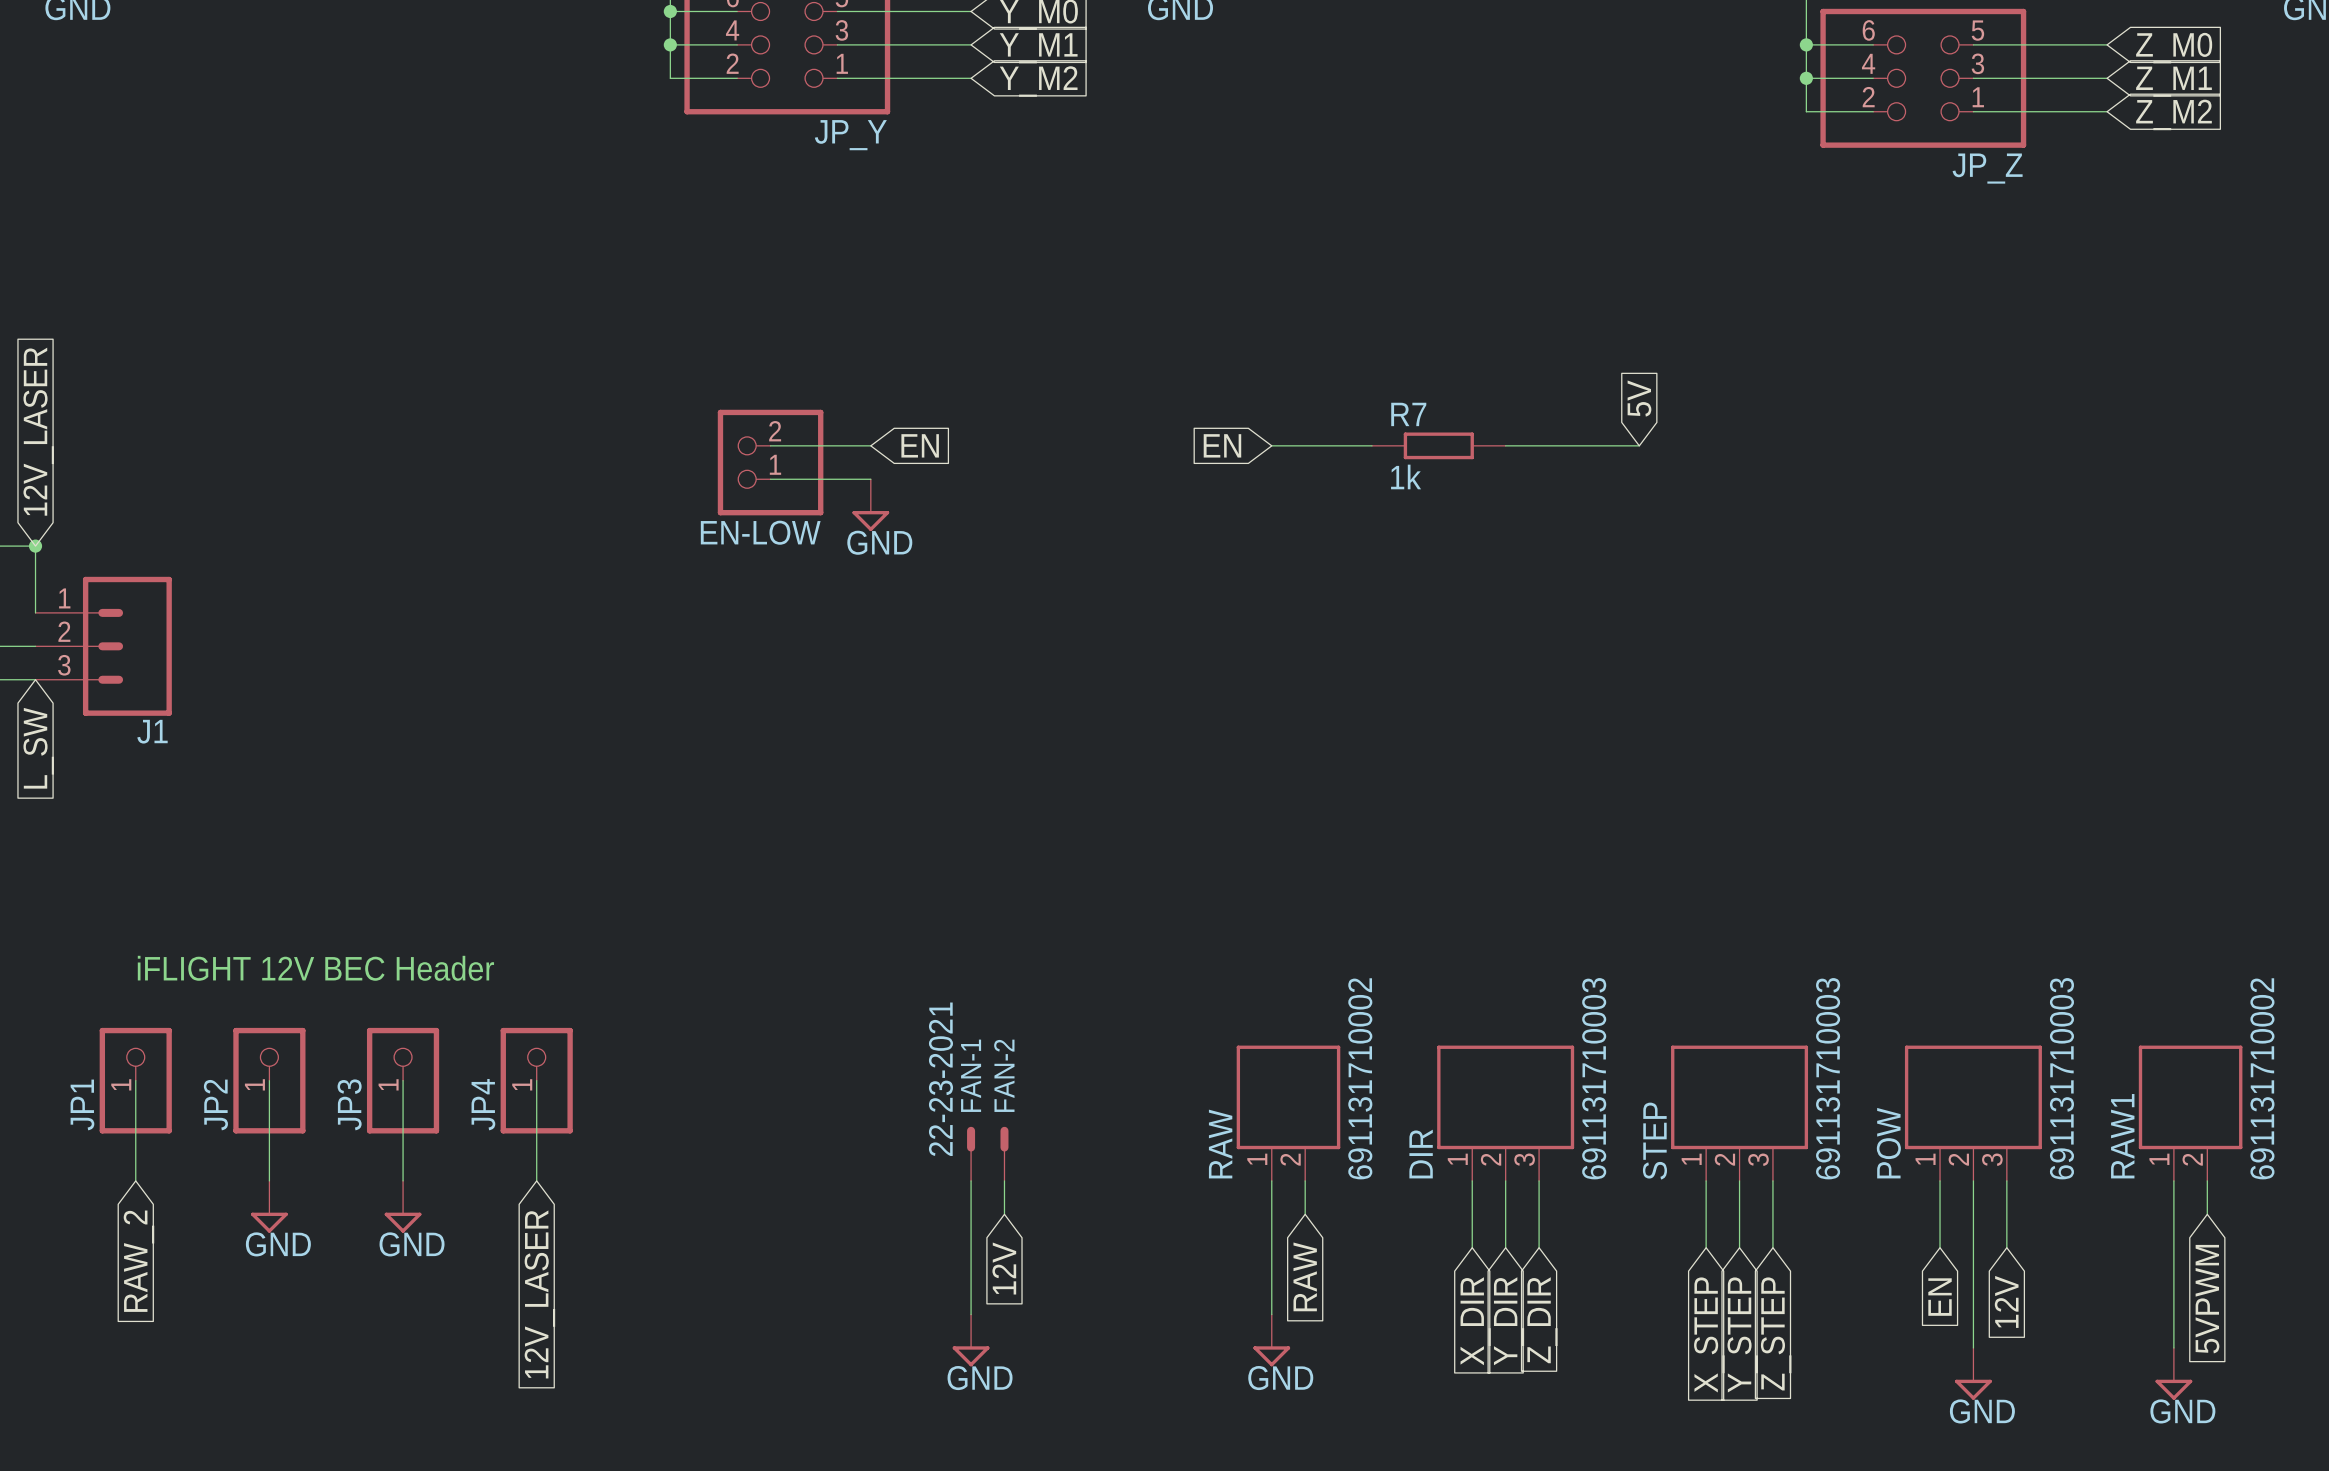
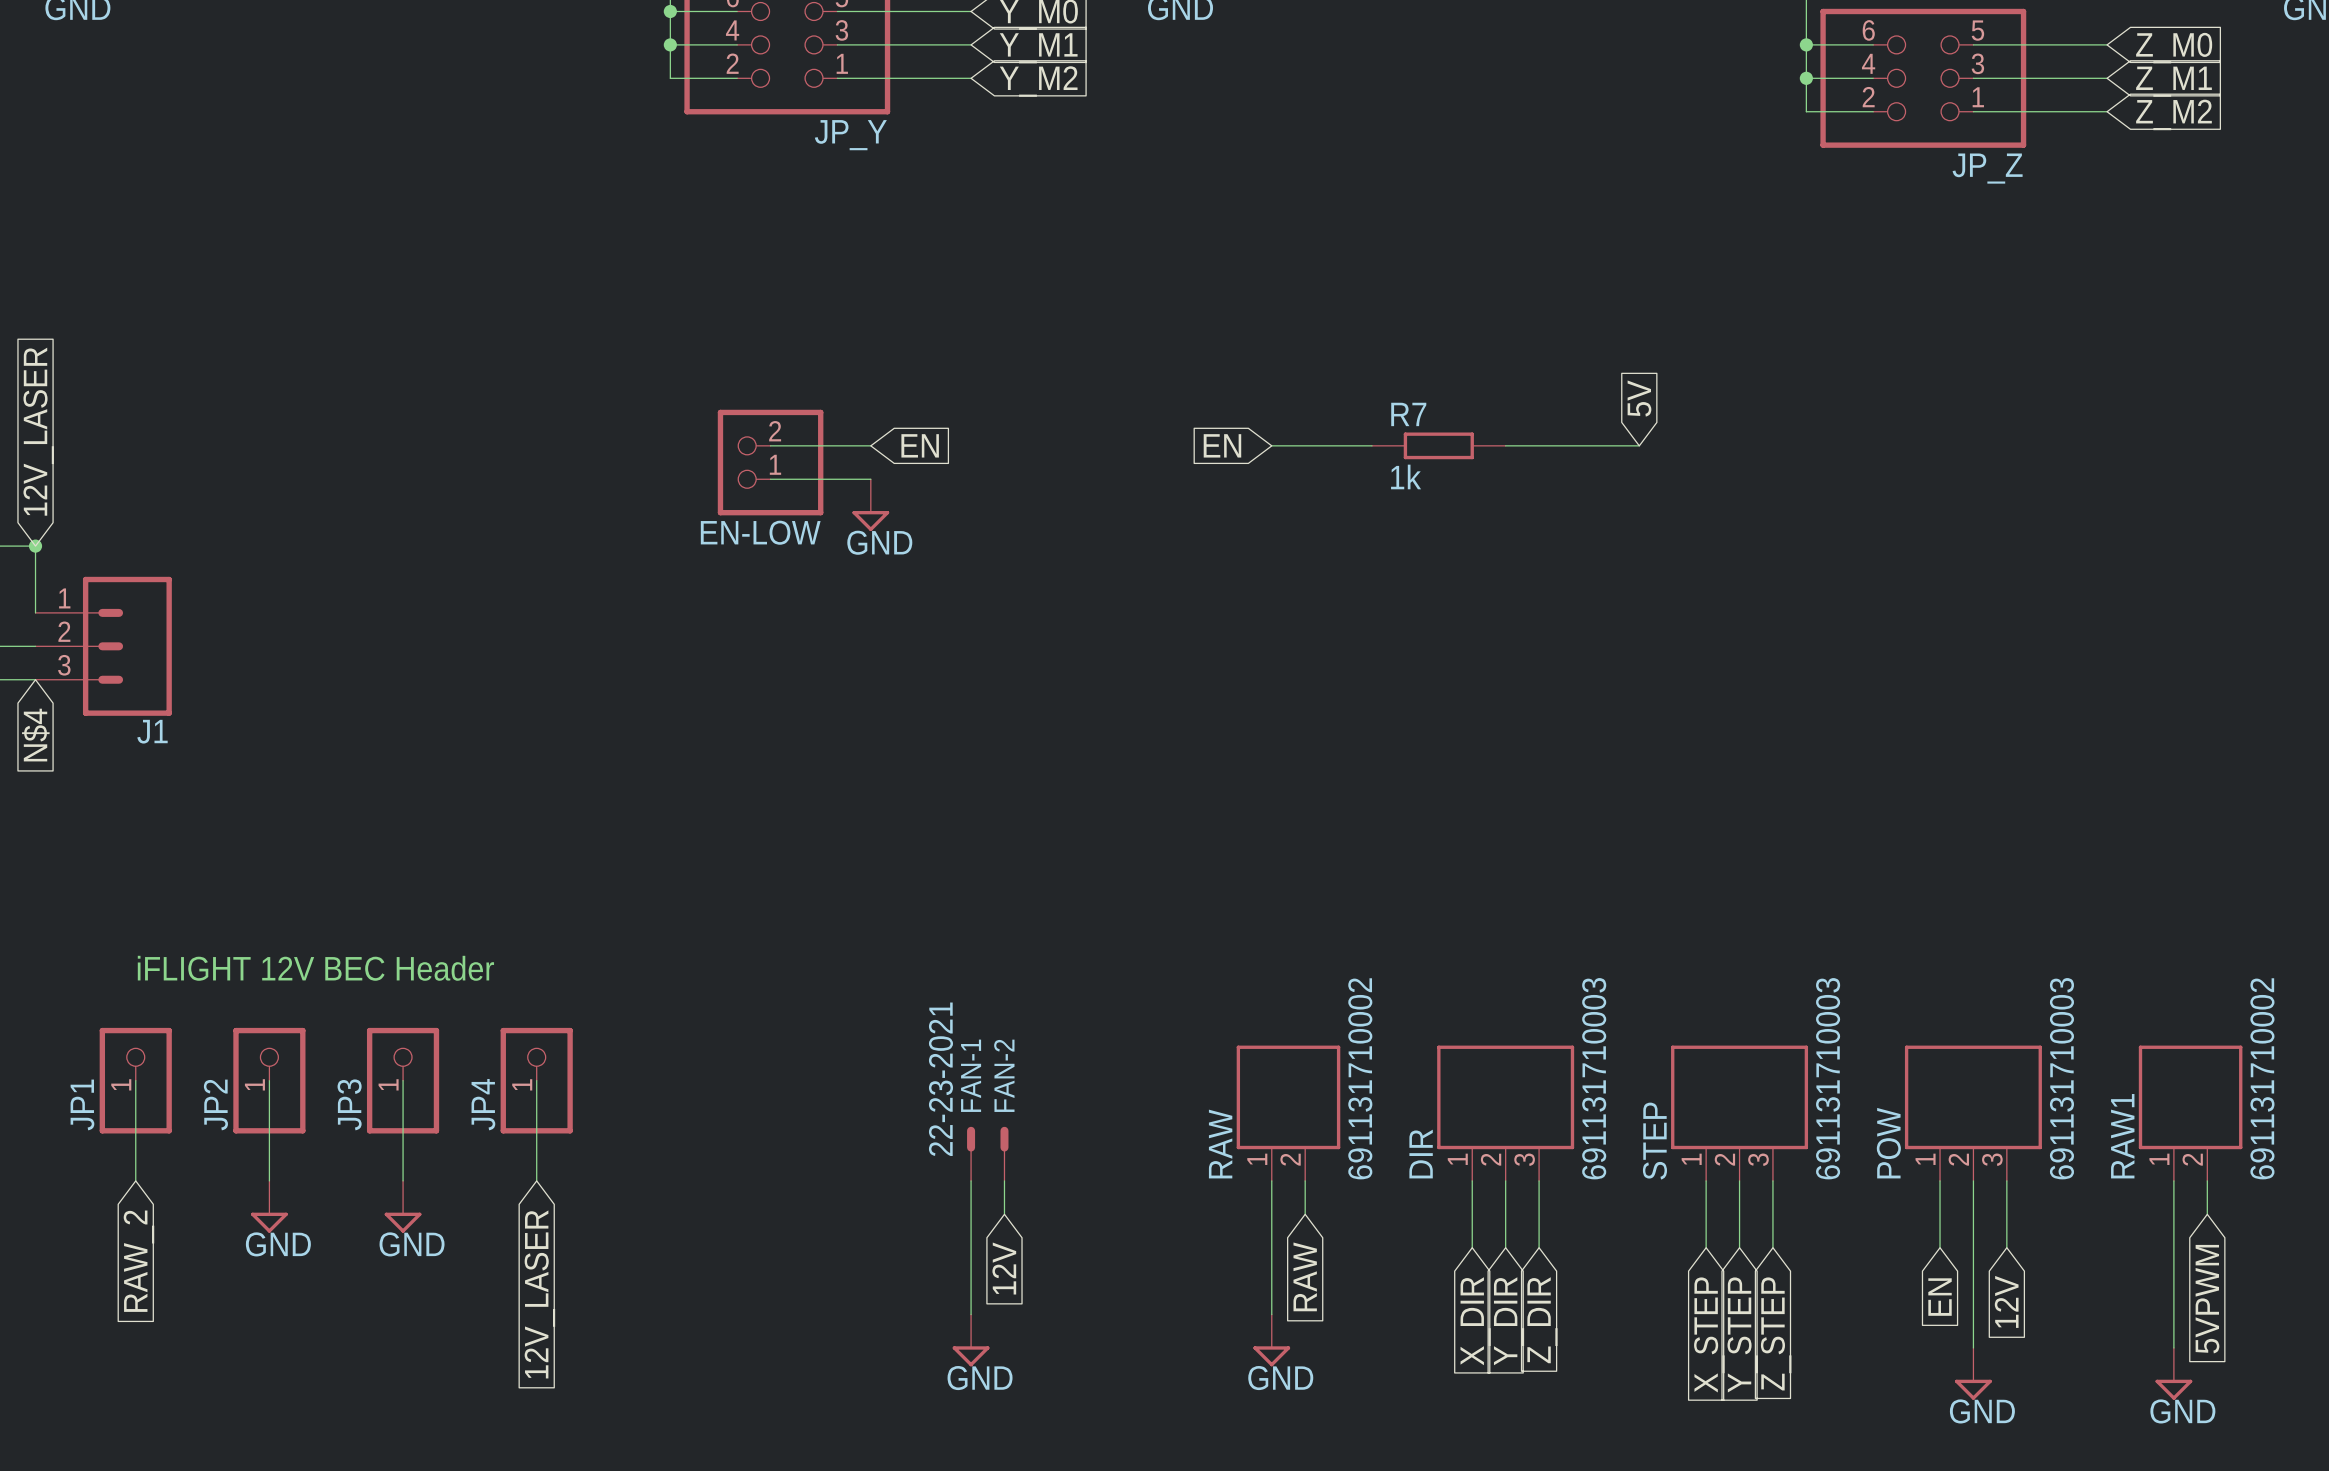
global label: L_SW (38, 748) -> N$4 (35, 735)

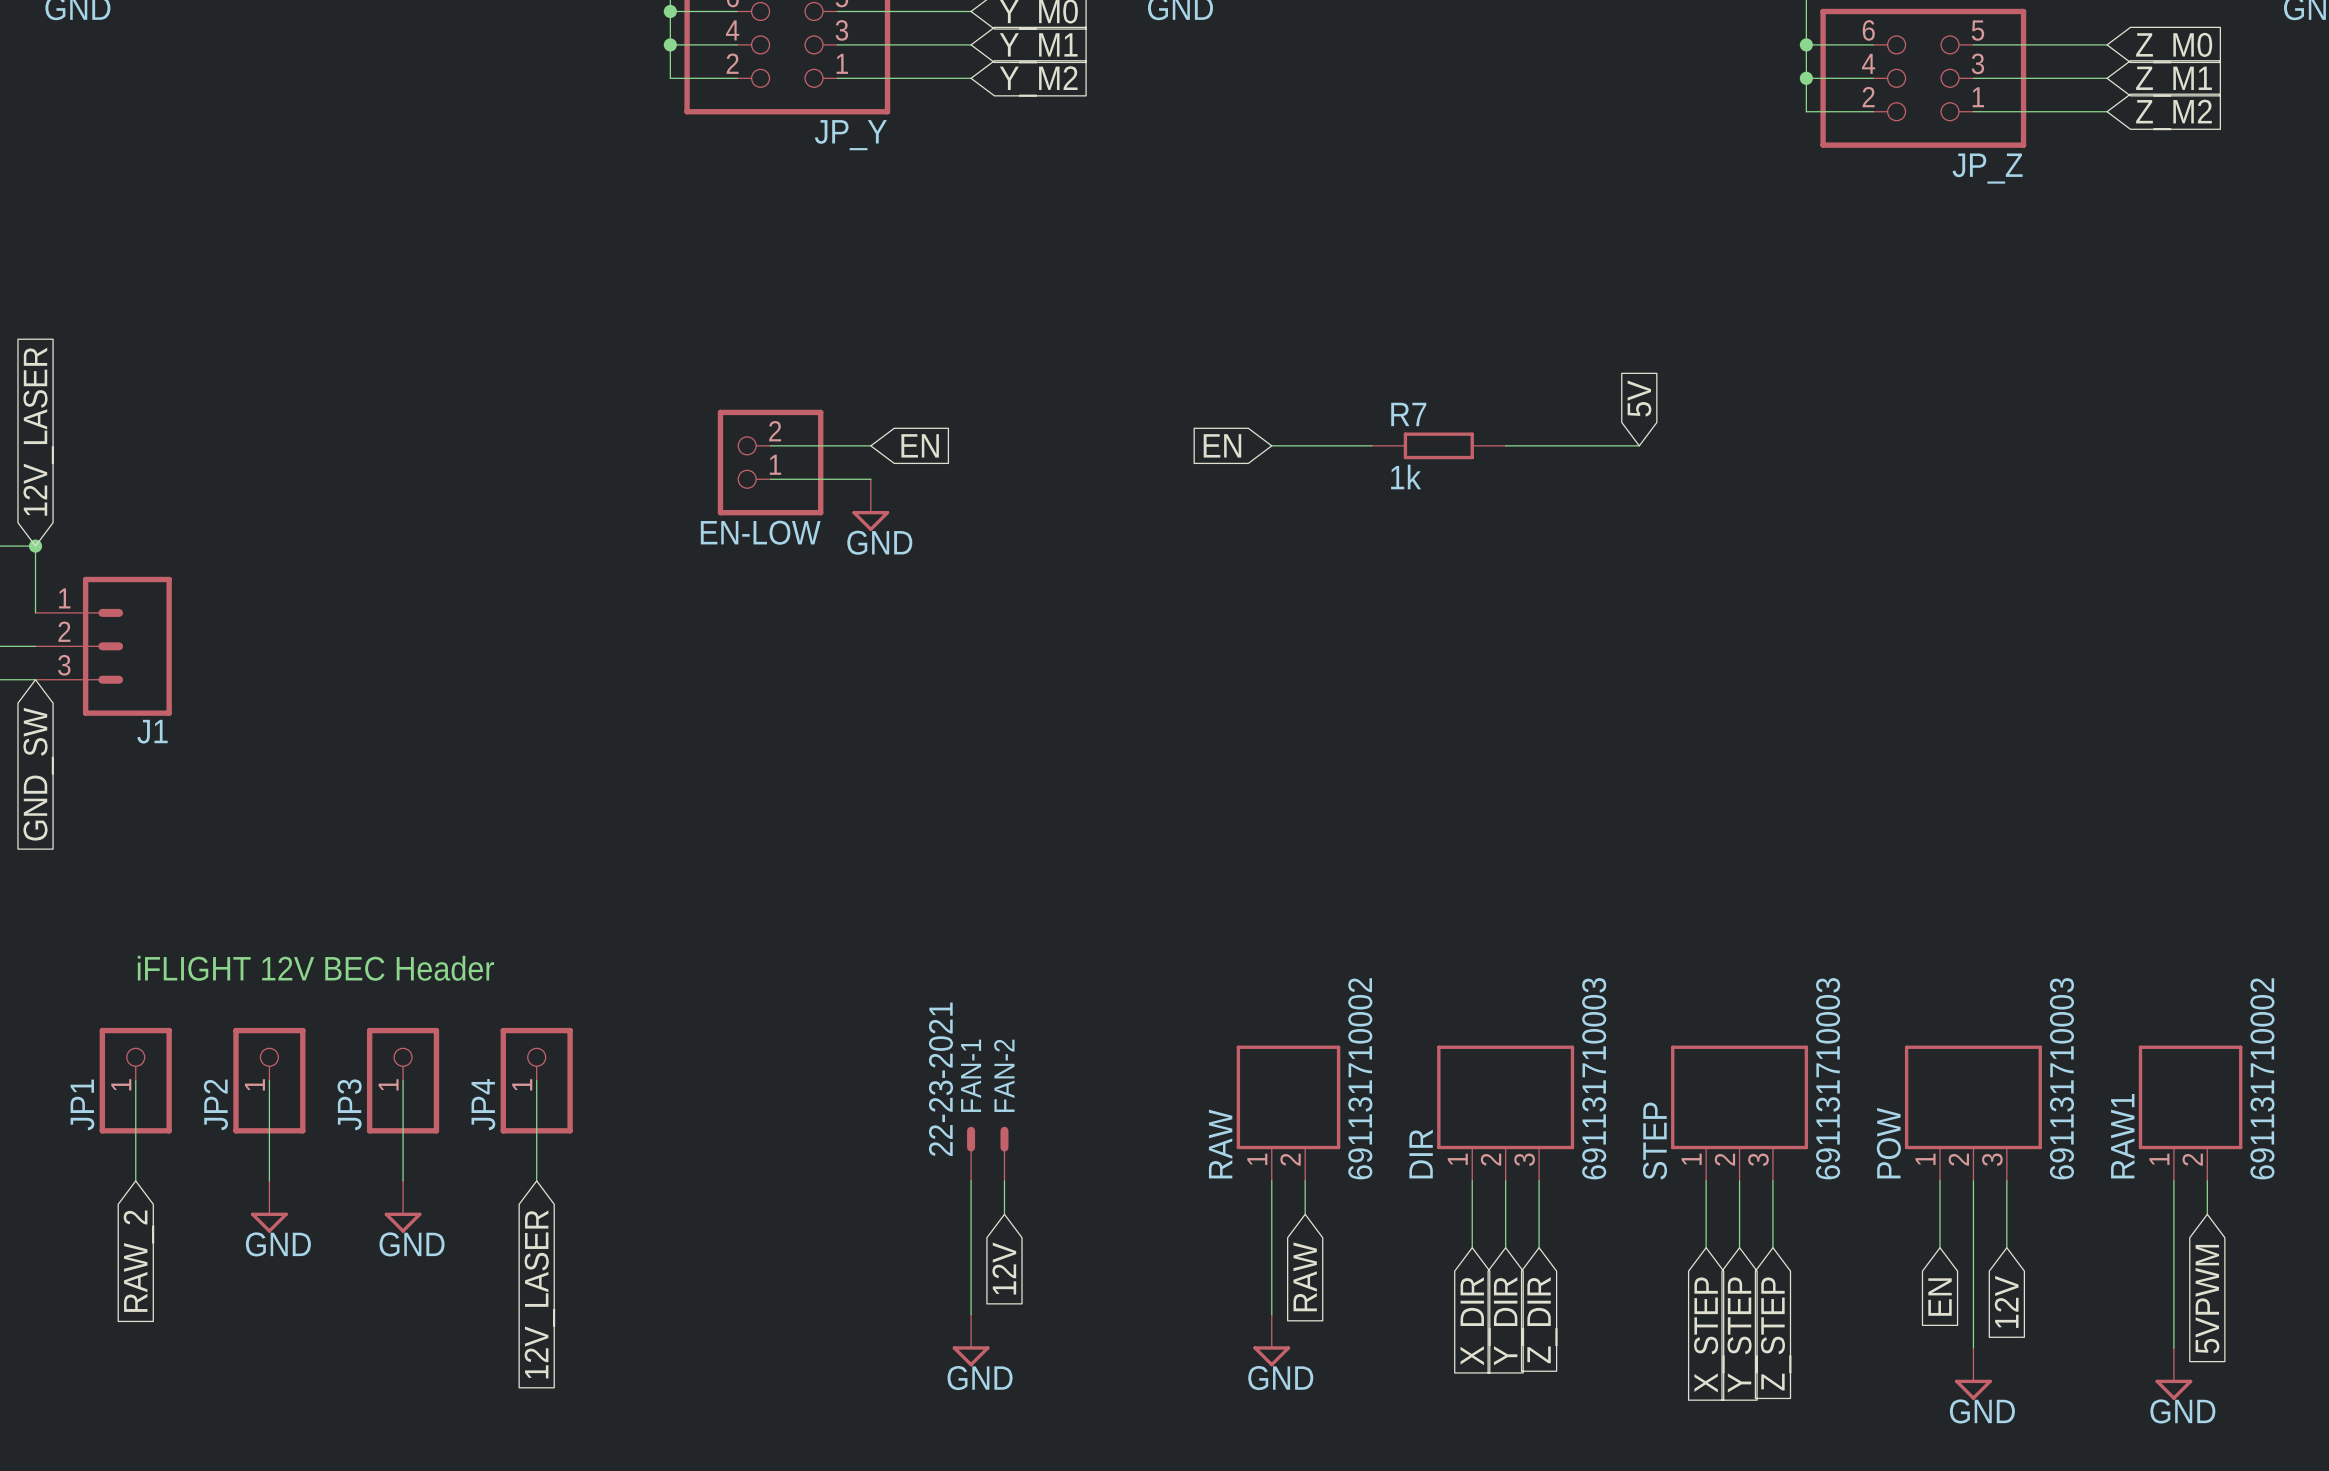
global label: N$4 (35, 735) -> GND_SW (38, 774)

